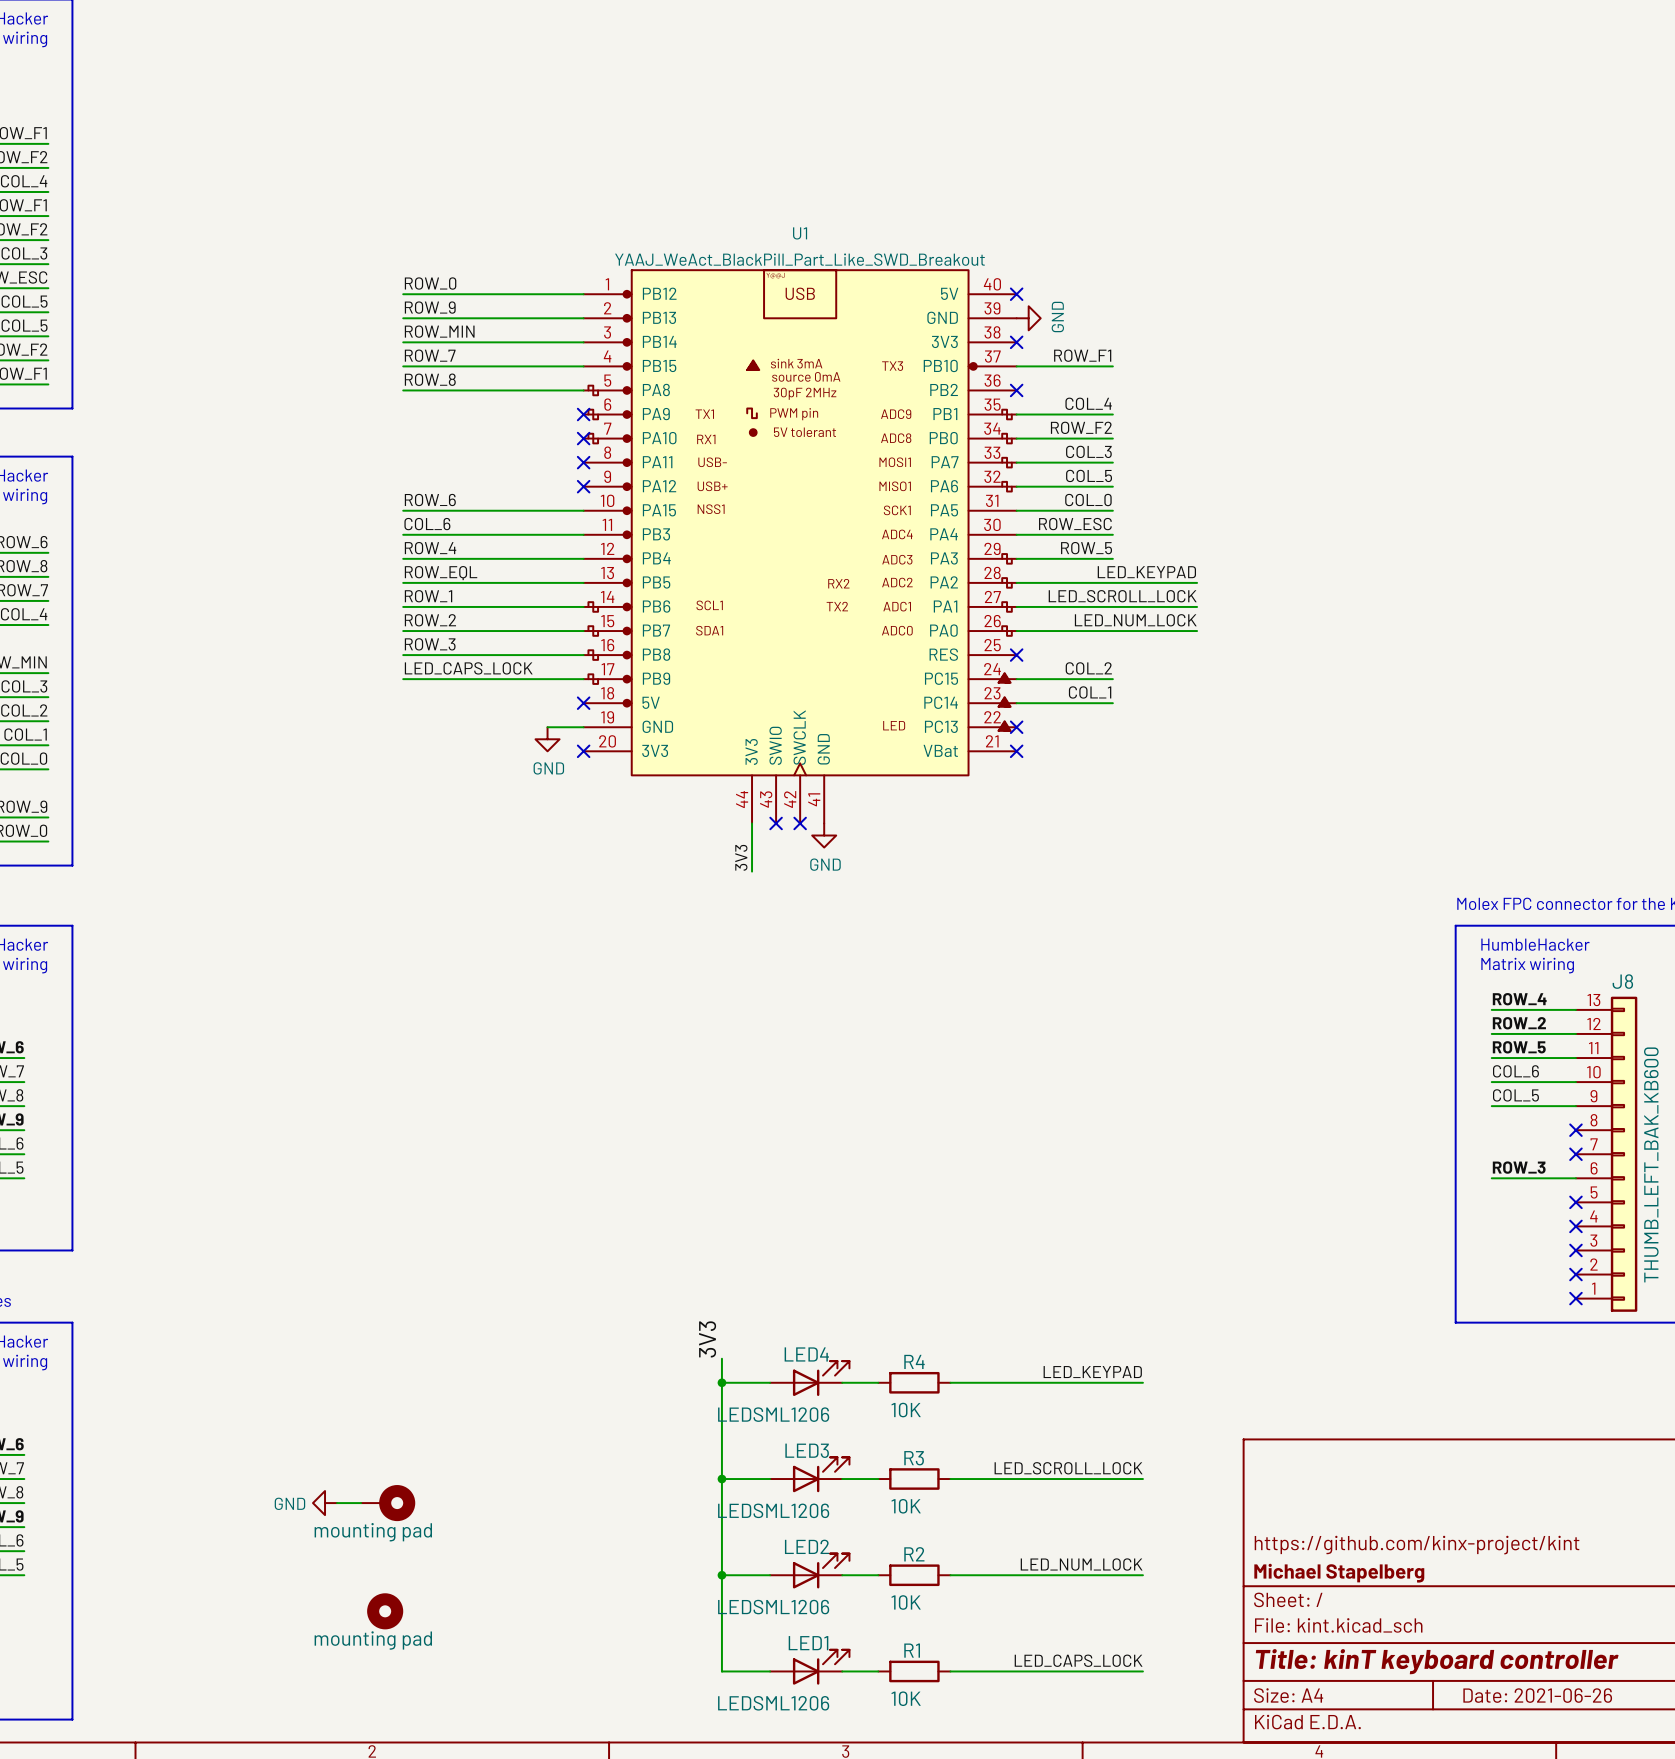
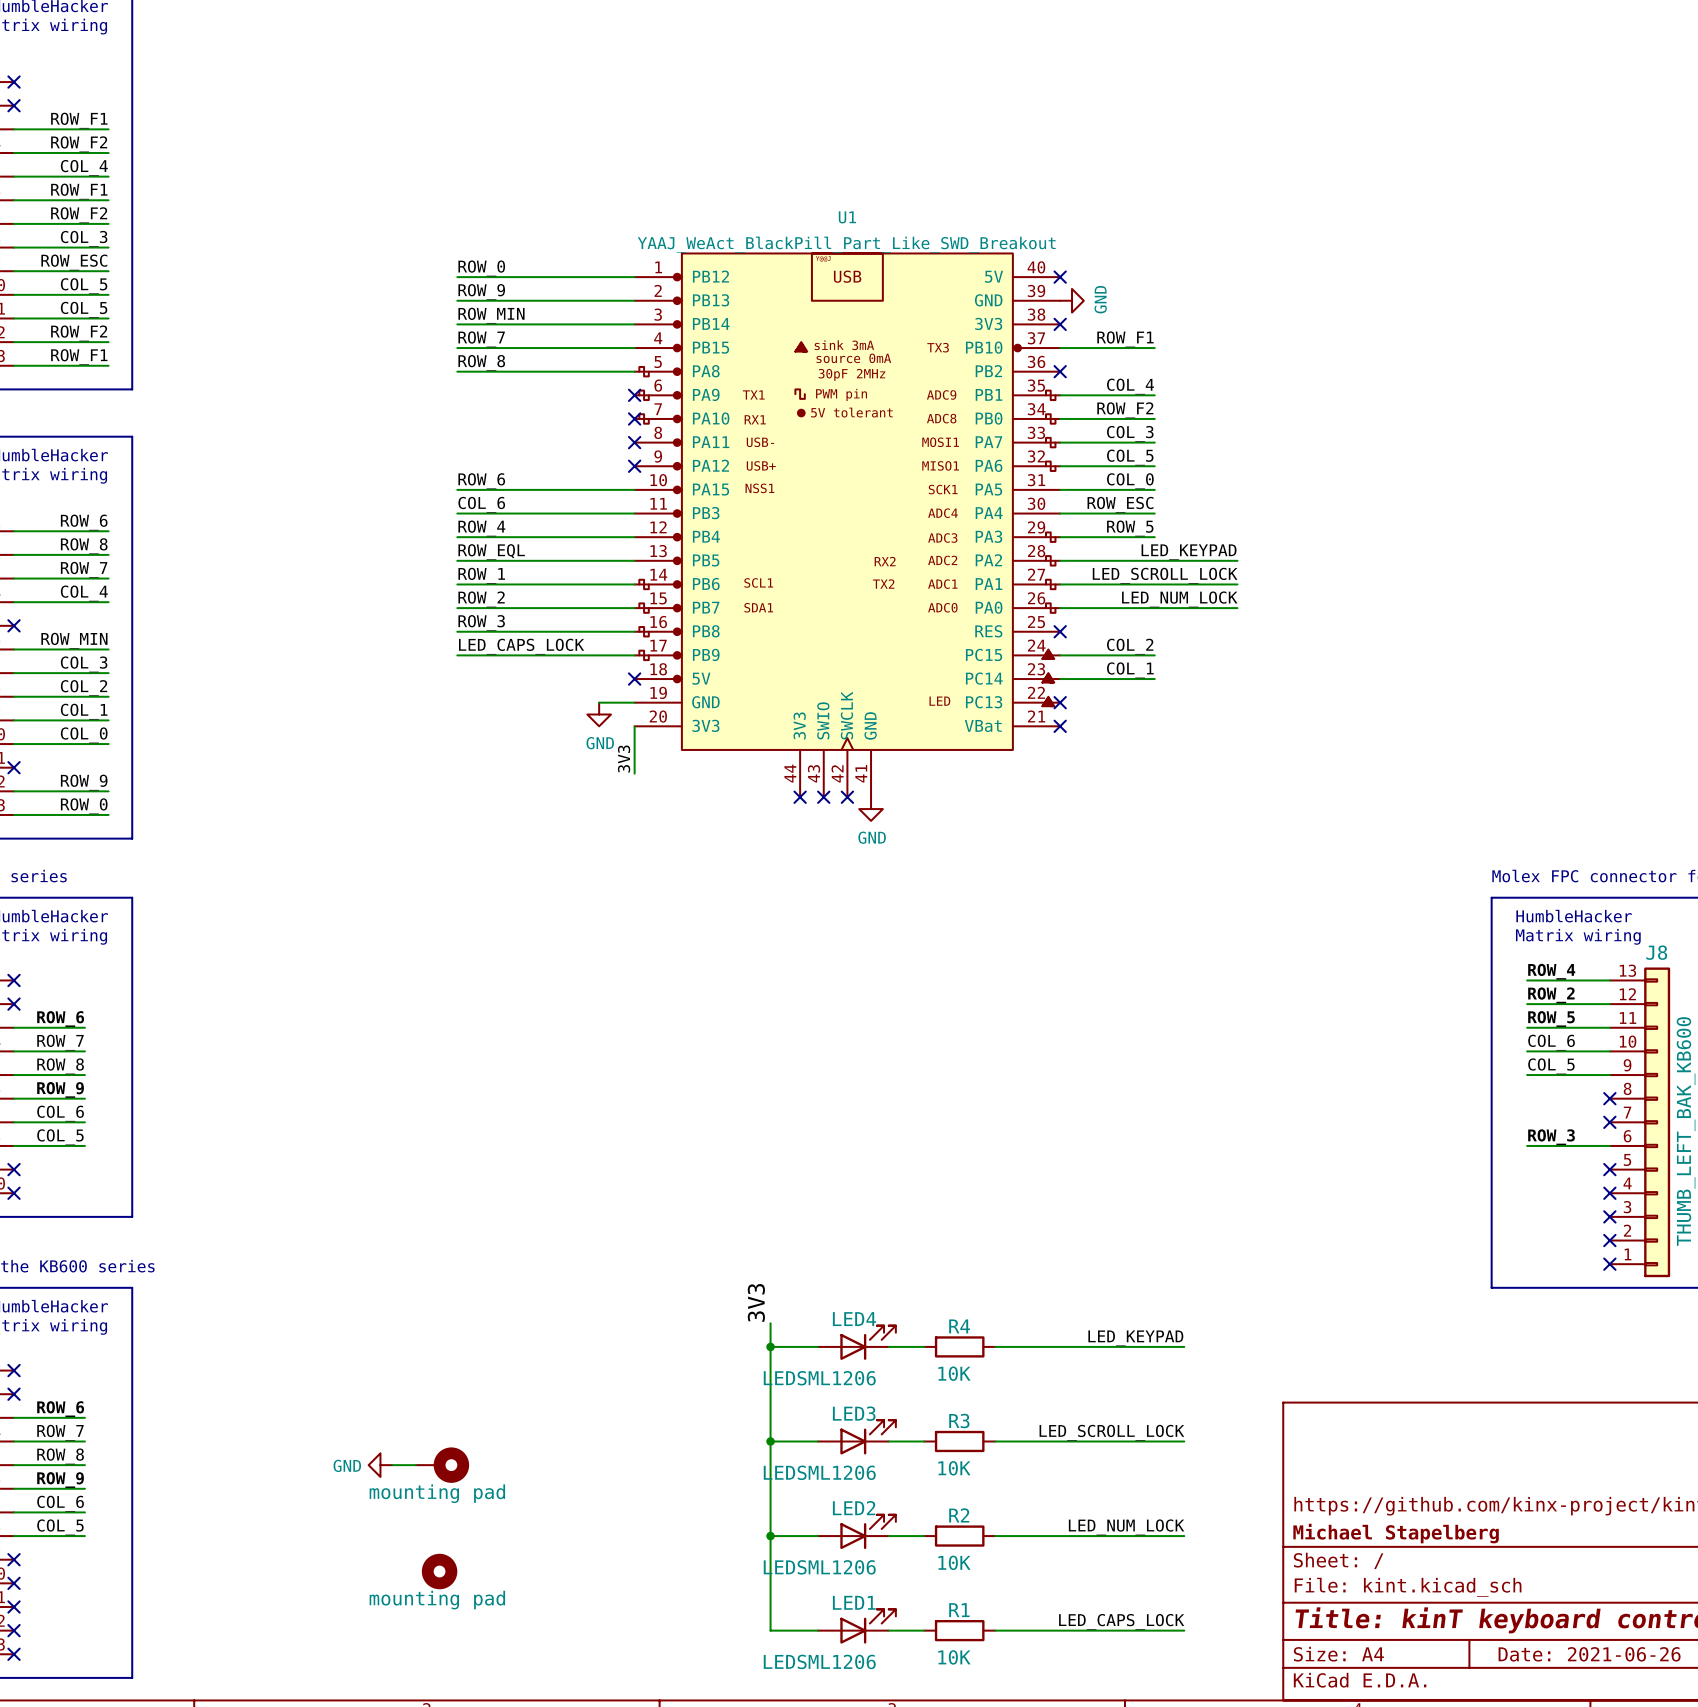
no-connect mark: (583, 751) -> none
wire: (752, 823) (752, 871) -> (634, 726) (634, 773)
no-connect mark: none -> (800, 797)
label position: 3V3 (741, 857) -> 3V3 (624, 759)

